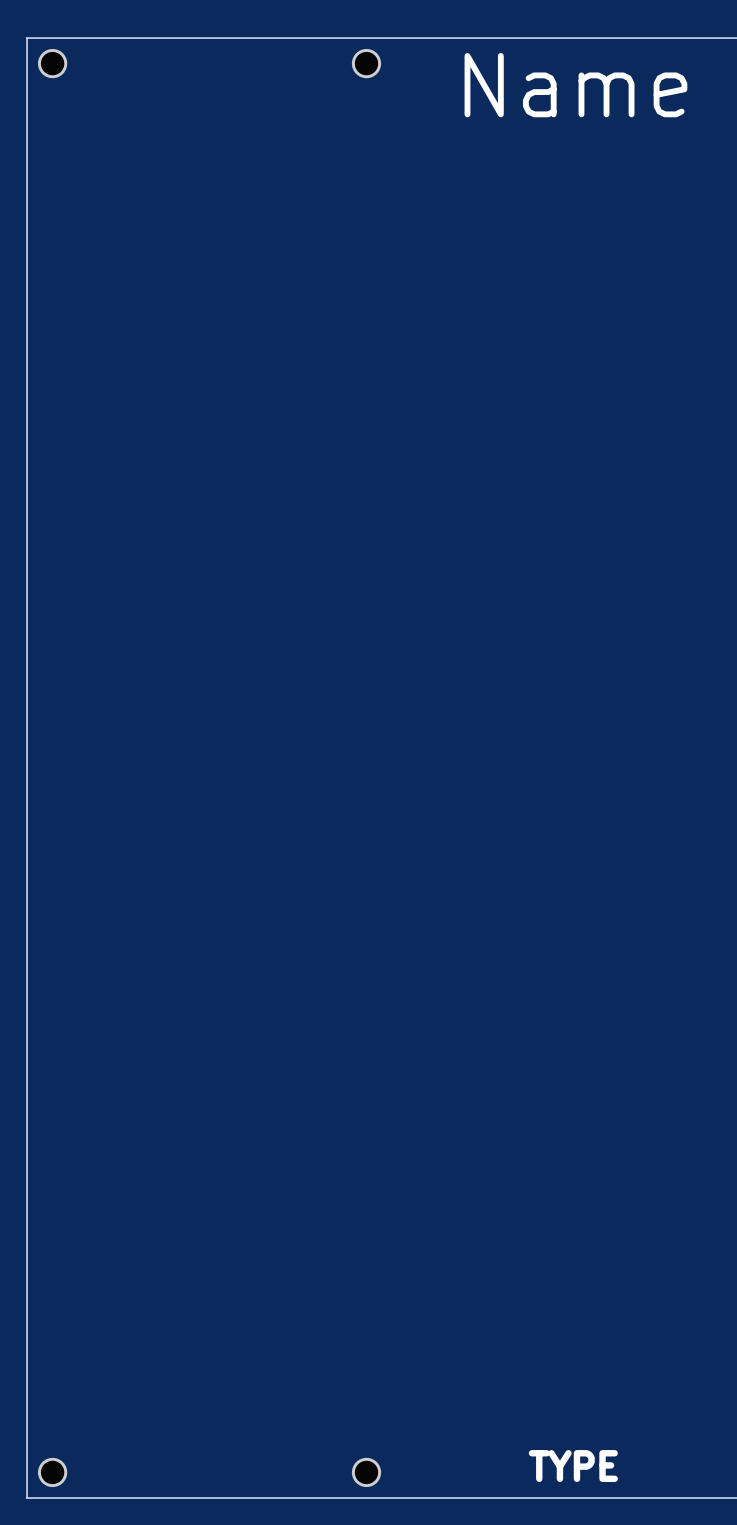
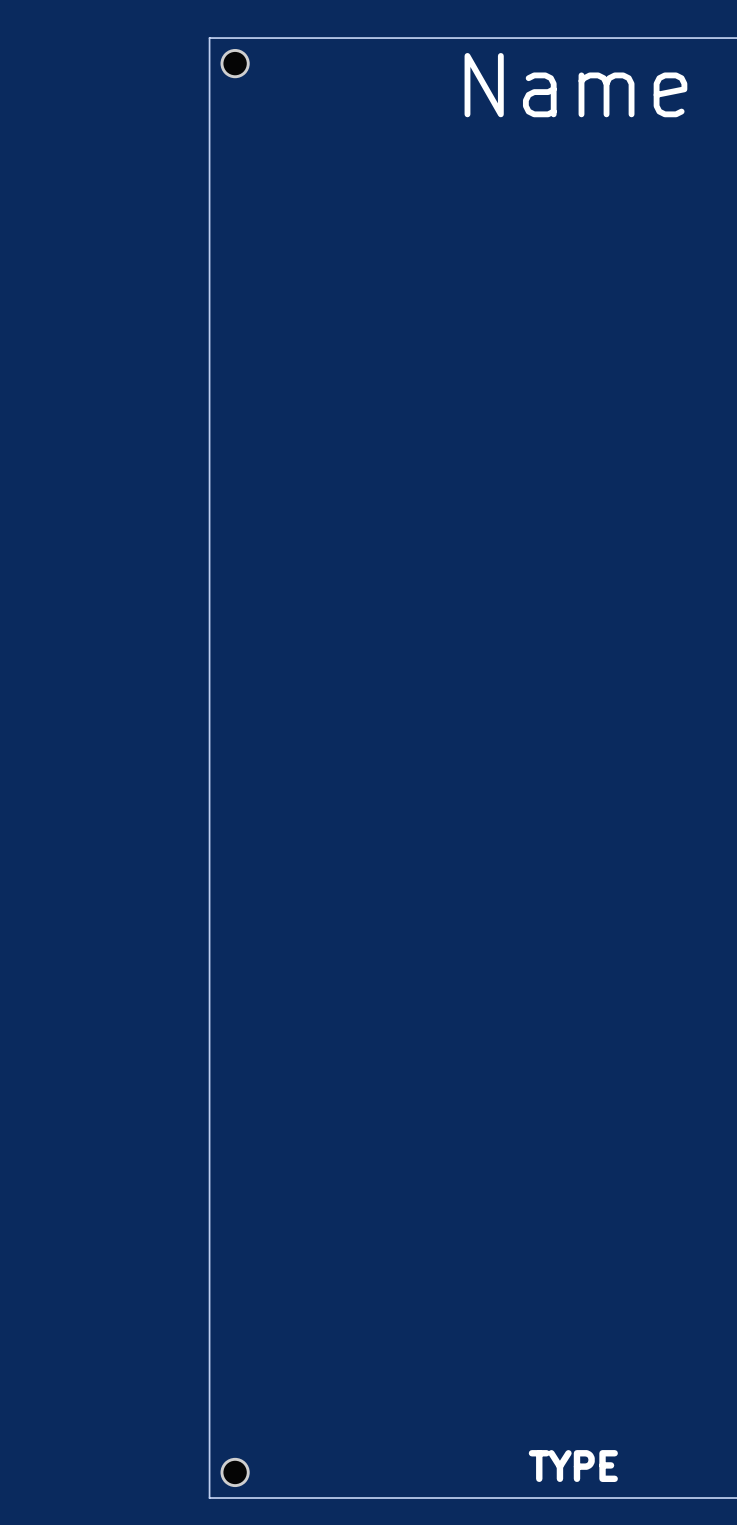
board edge: (209, 38) (27, 38) (27, 1498) (209, 1498) -> (209, 38) (209, 1498)
part: (52, 63) -> none
part: none -> (235, 63)
part: (366, 63) -> none
part: (52, 1472) -> none
part: none -> (235, 1472)
part: (366, 1472) -> none

